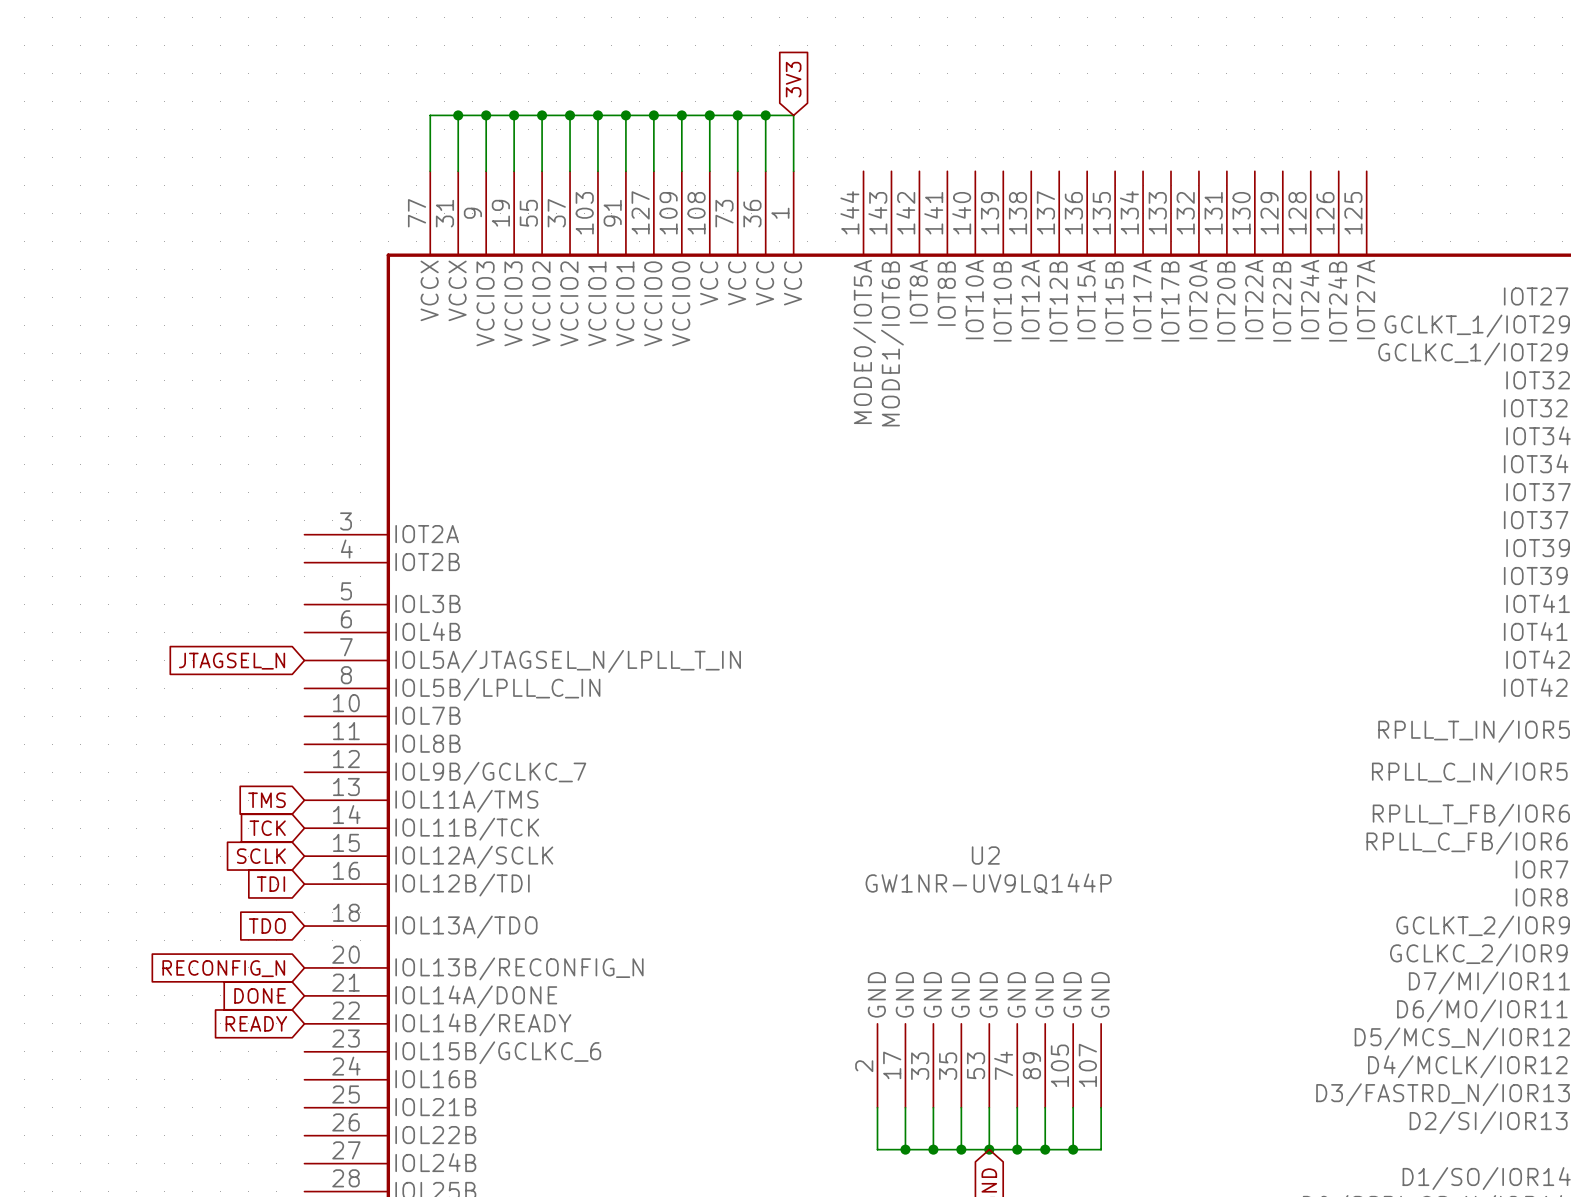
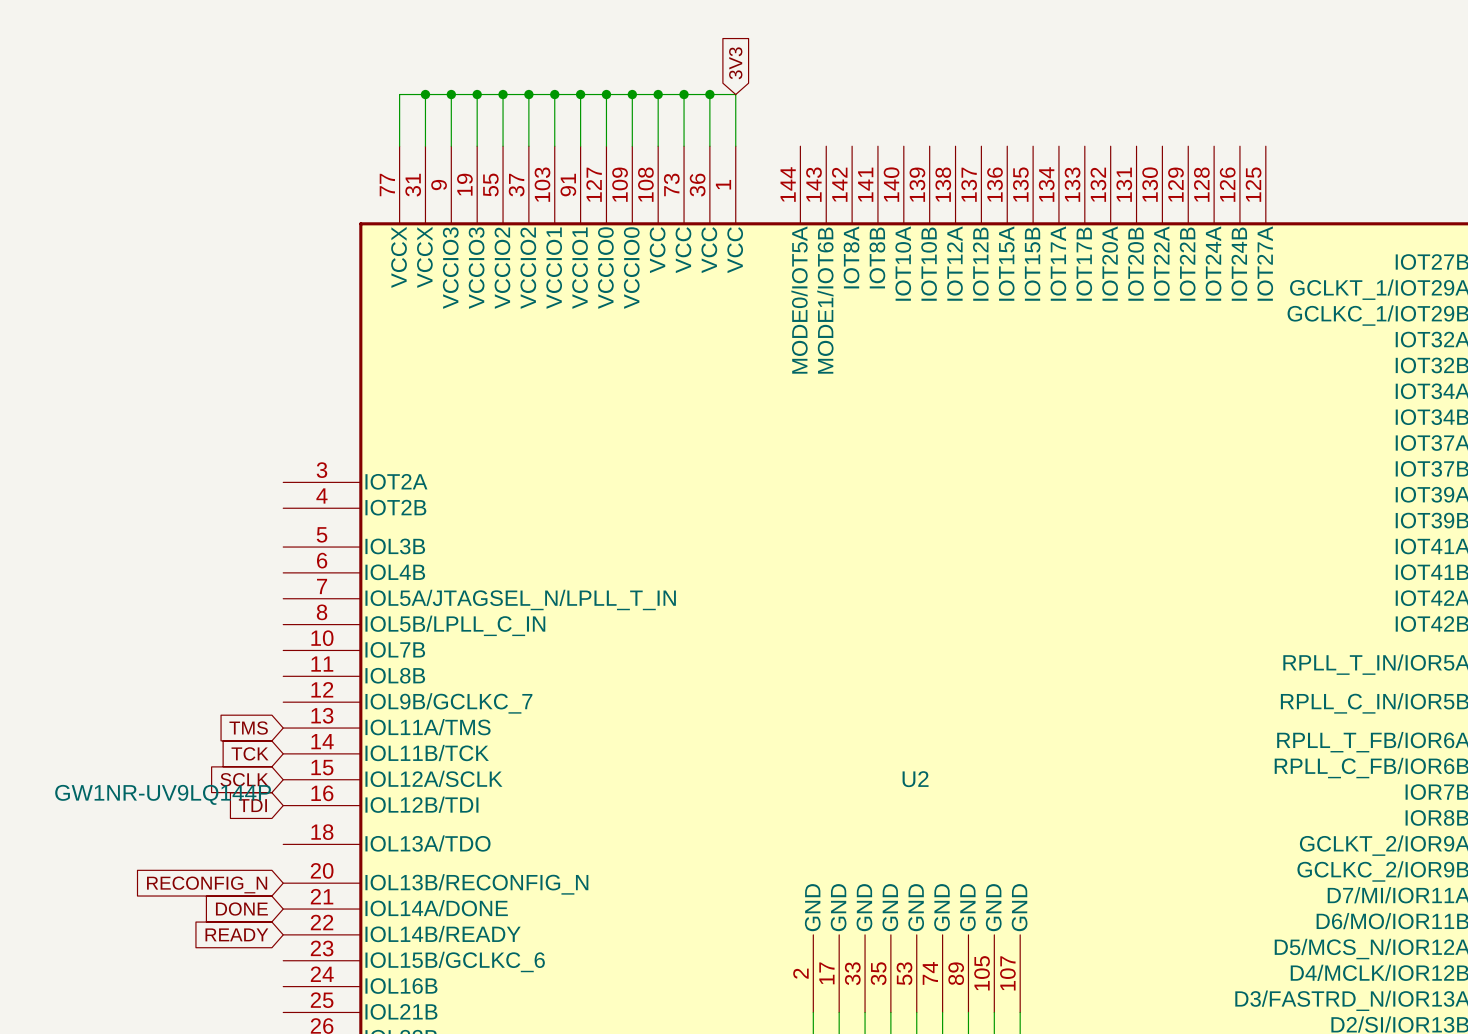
global label: JTAGSEL_N (232, 661) -> none
U2 value position: GW1NR-UV9LQ144P (988, 883) -> GW1NR-UV9LQ144P (163, 794)
global label: TDO (267, 926) -> none

